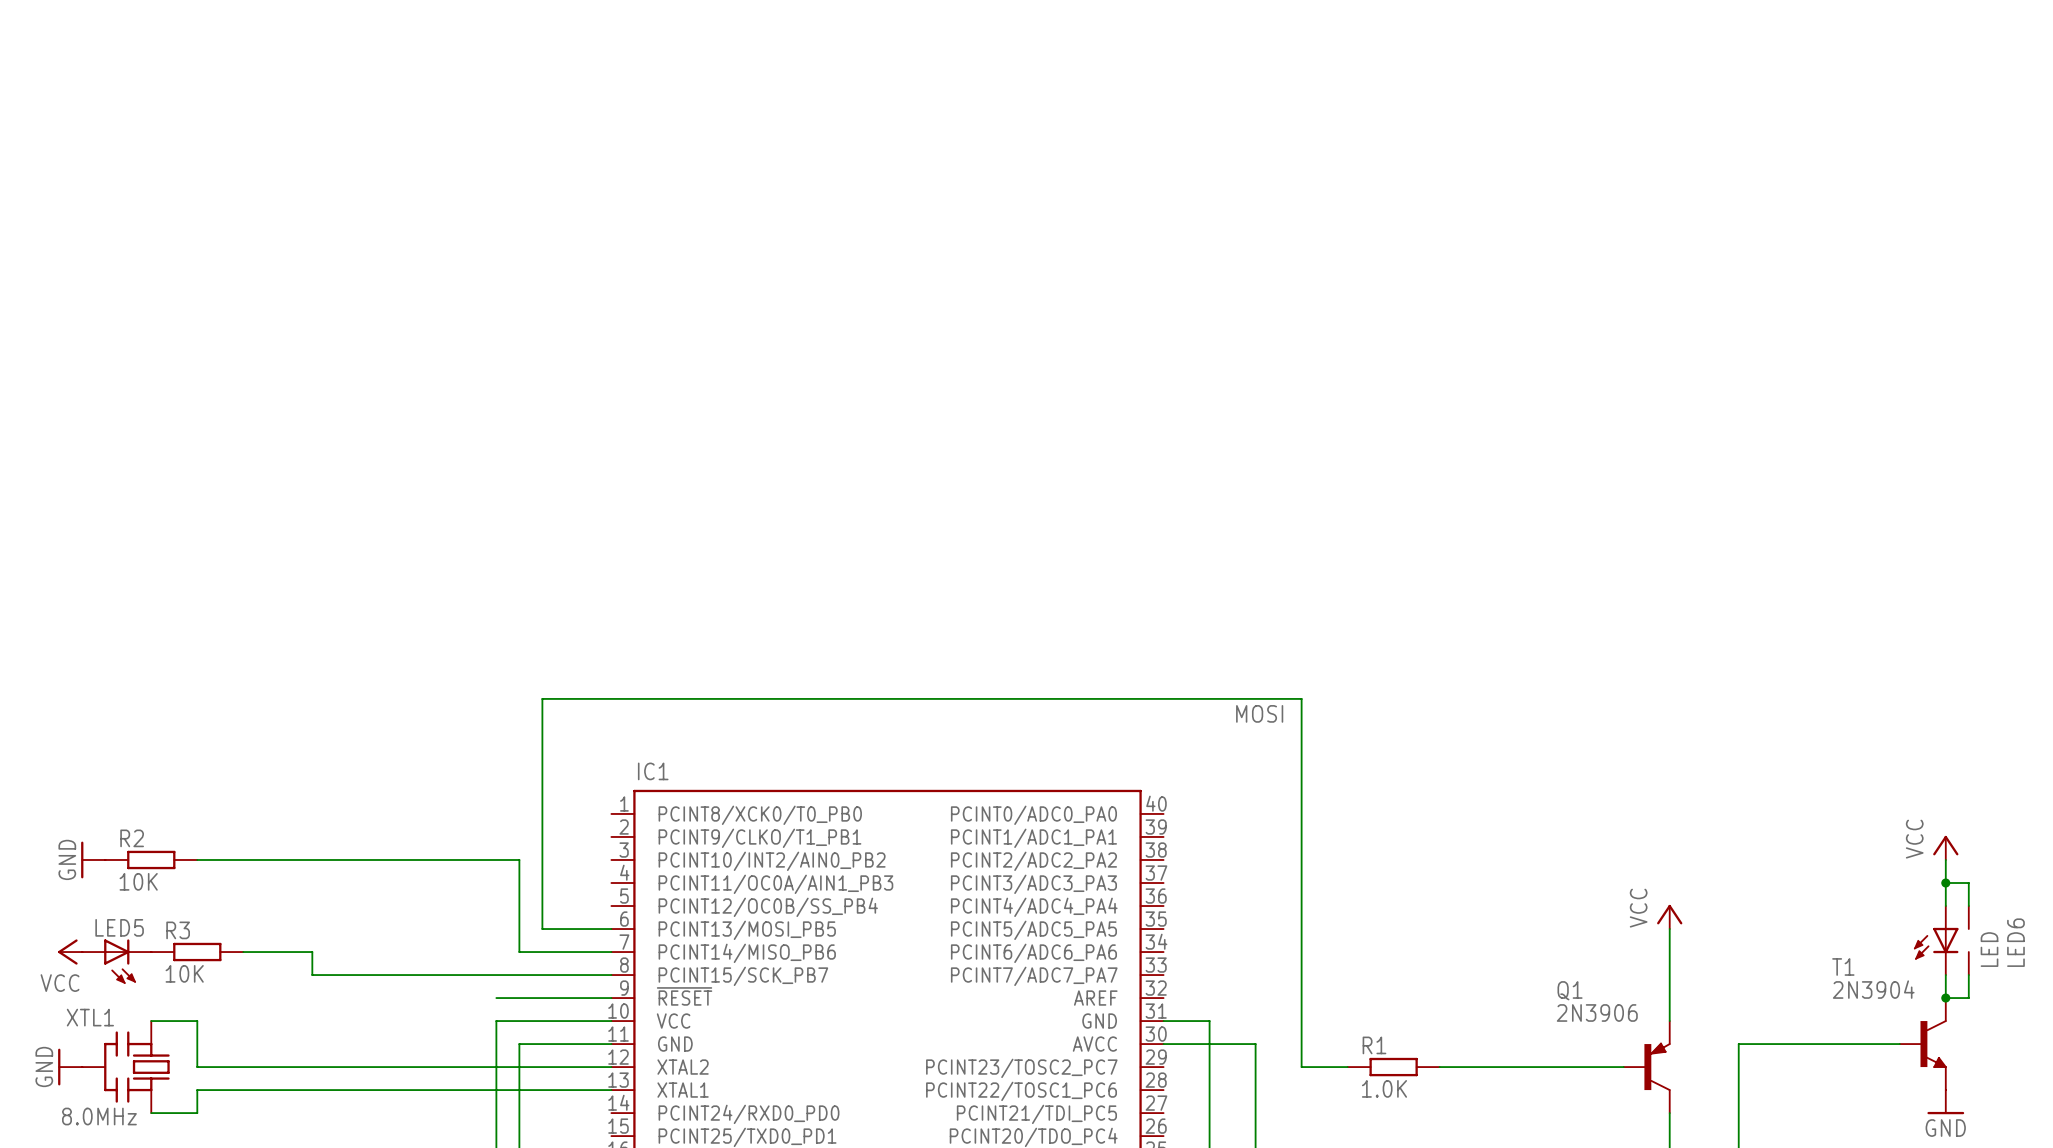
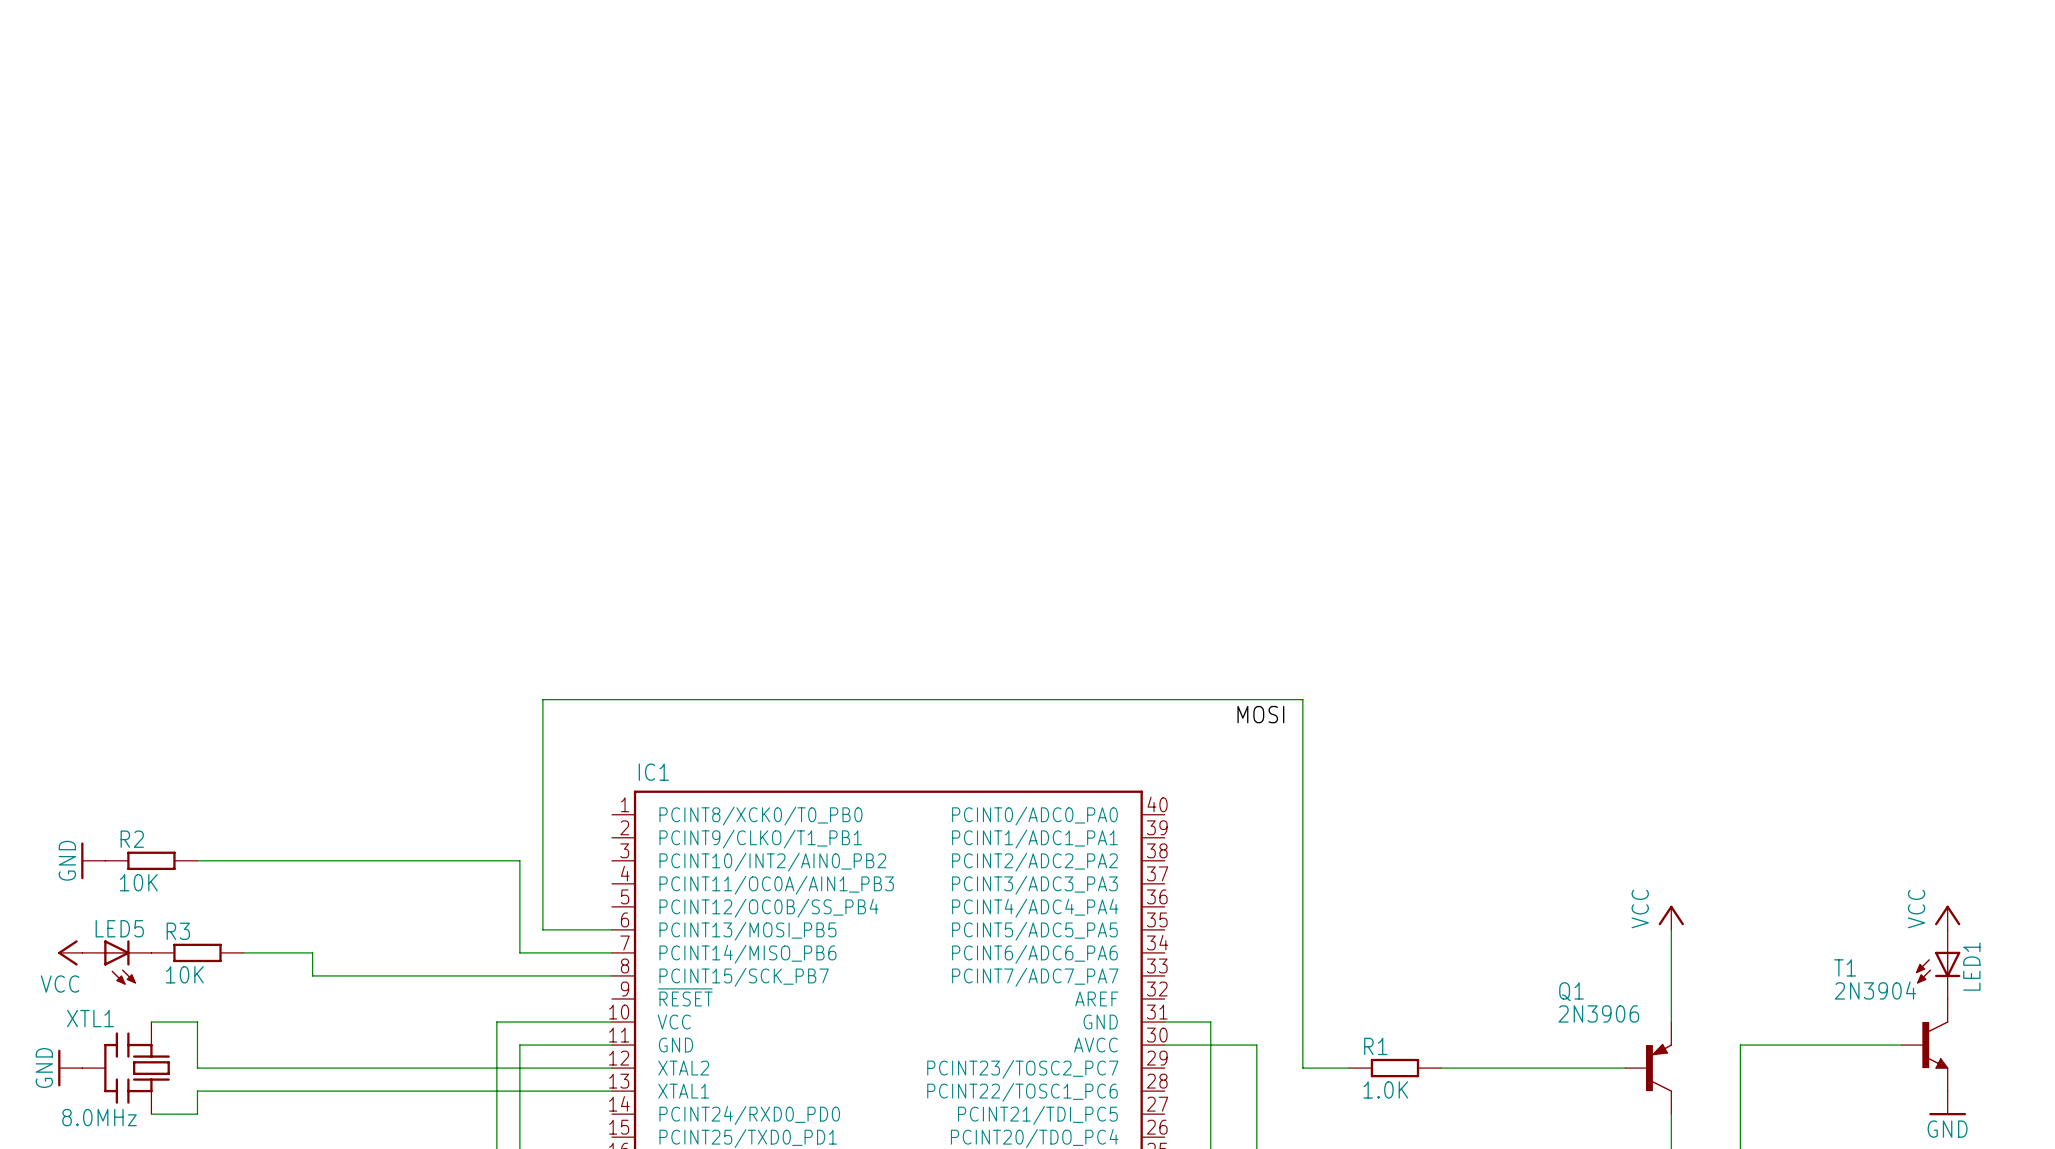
power symbol position: VCC (1945, 847) -> VCC (1947, 917)
wire: (1945, 859) (1945, 906) -> none
wire: (1945, 883) (1968, 883) (1968, 906) -> none
junction: (1945, 883) -> none
LED6: LED (1941, 940) -> none
LED1: none -> (1938, 964)
wire: (1945, 975) (1945, 998) (1968, 998) (1968, 975) -> none
wire: (496, 998) (611, 998) -> none
junction: (1945, 998) -> none

